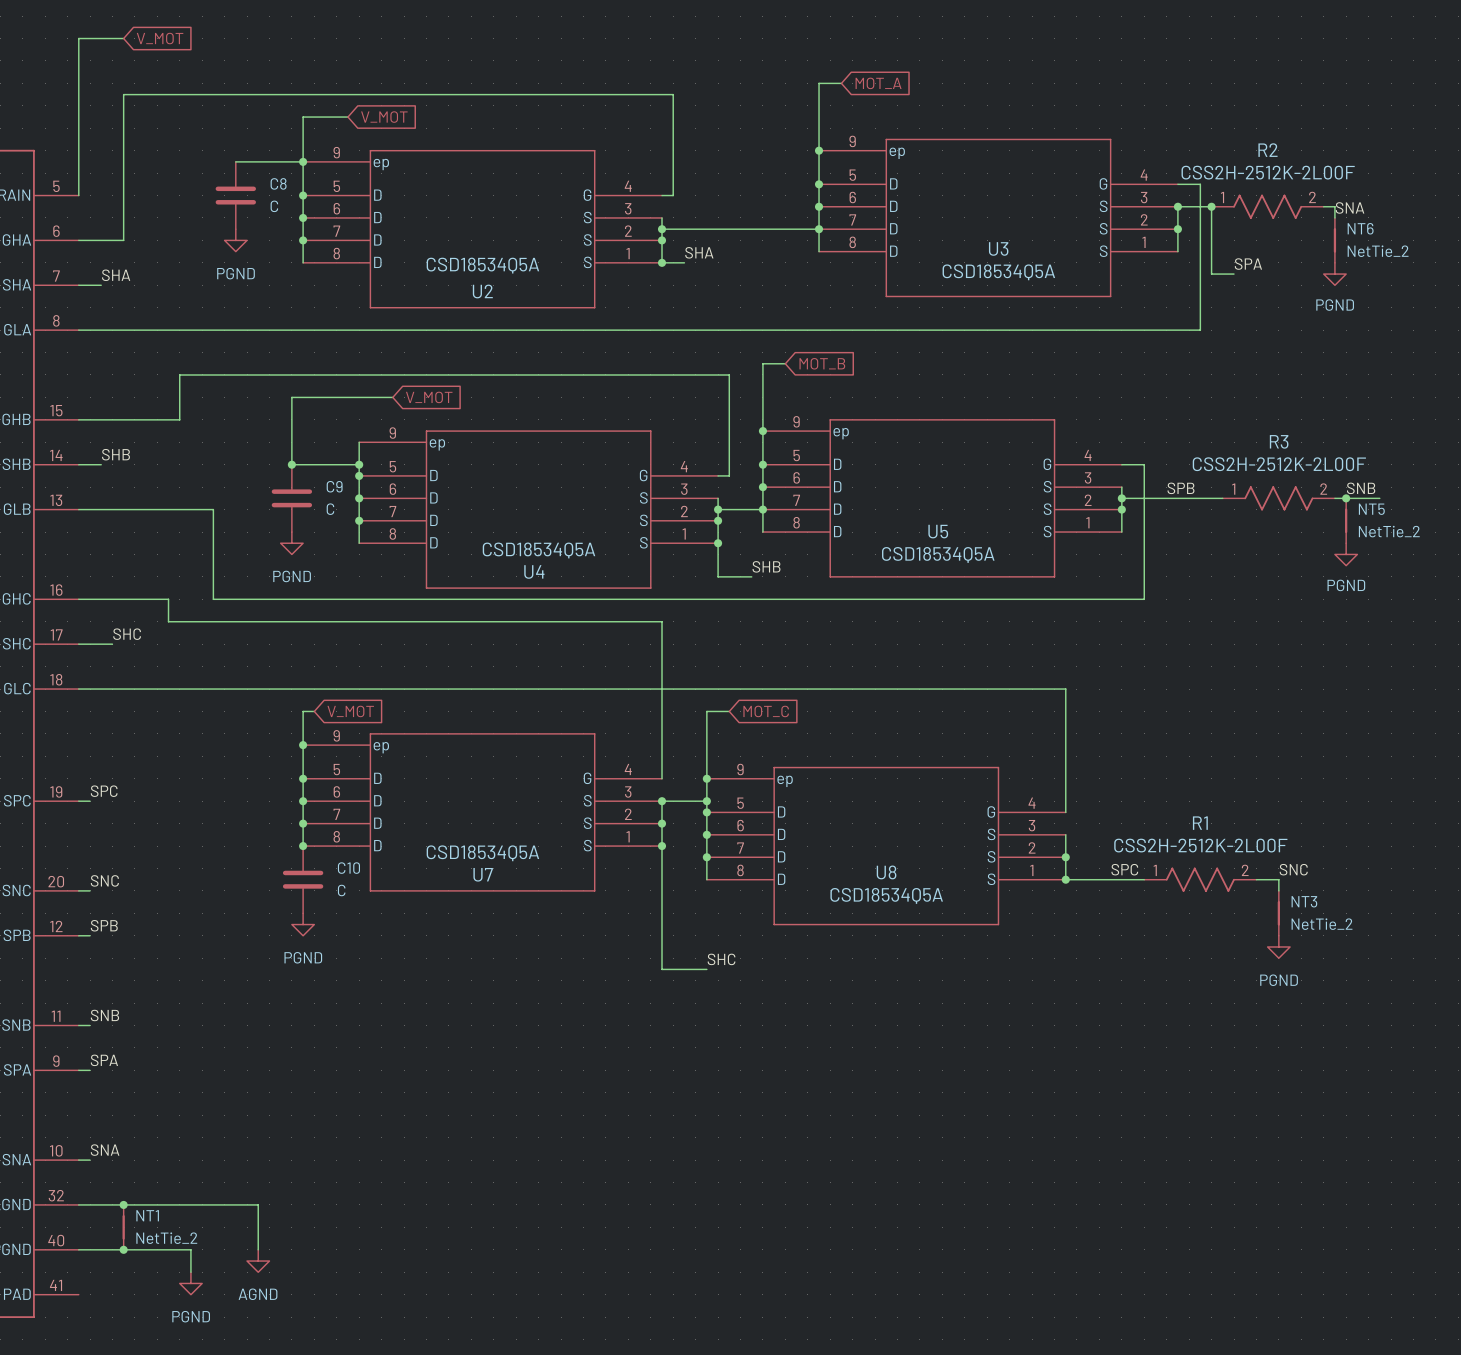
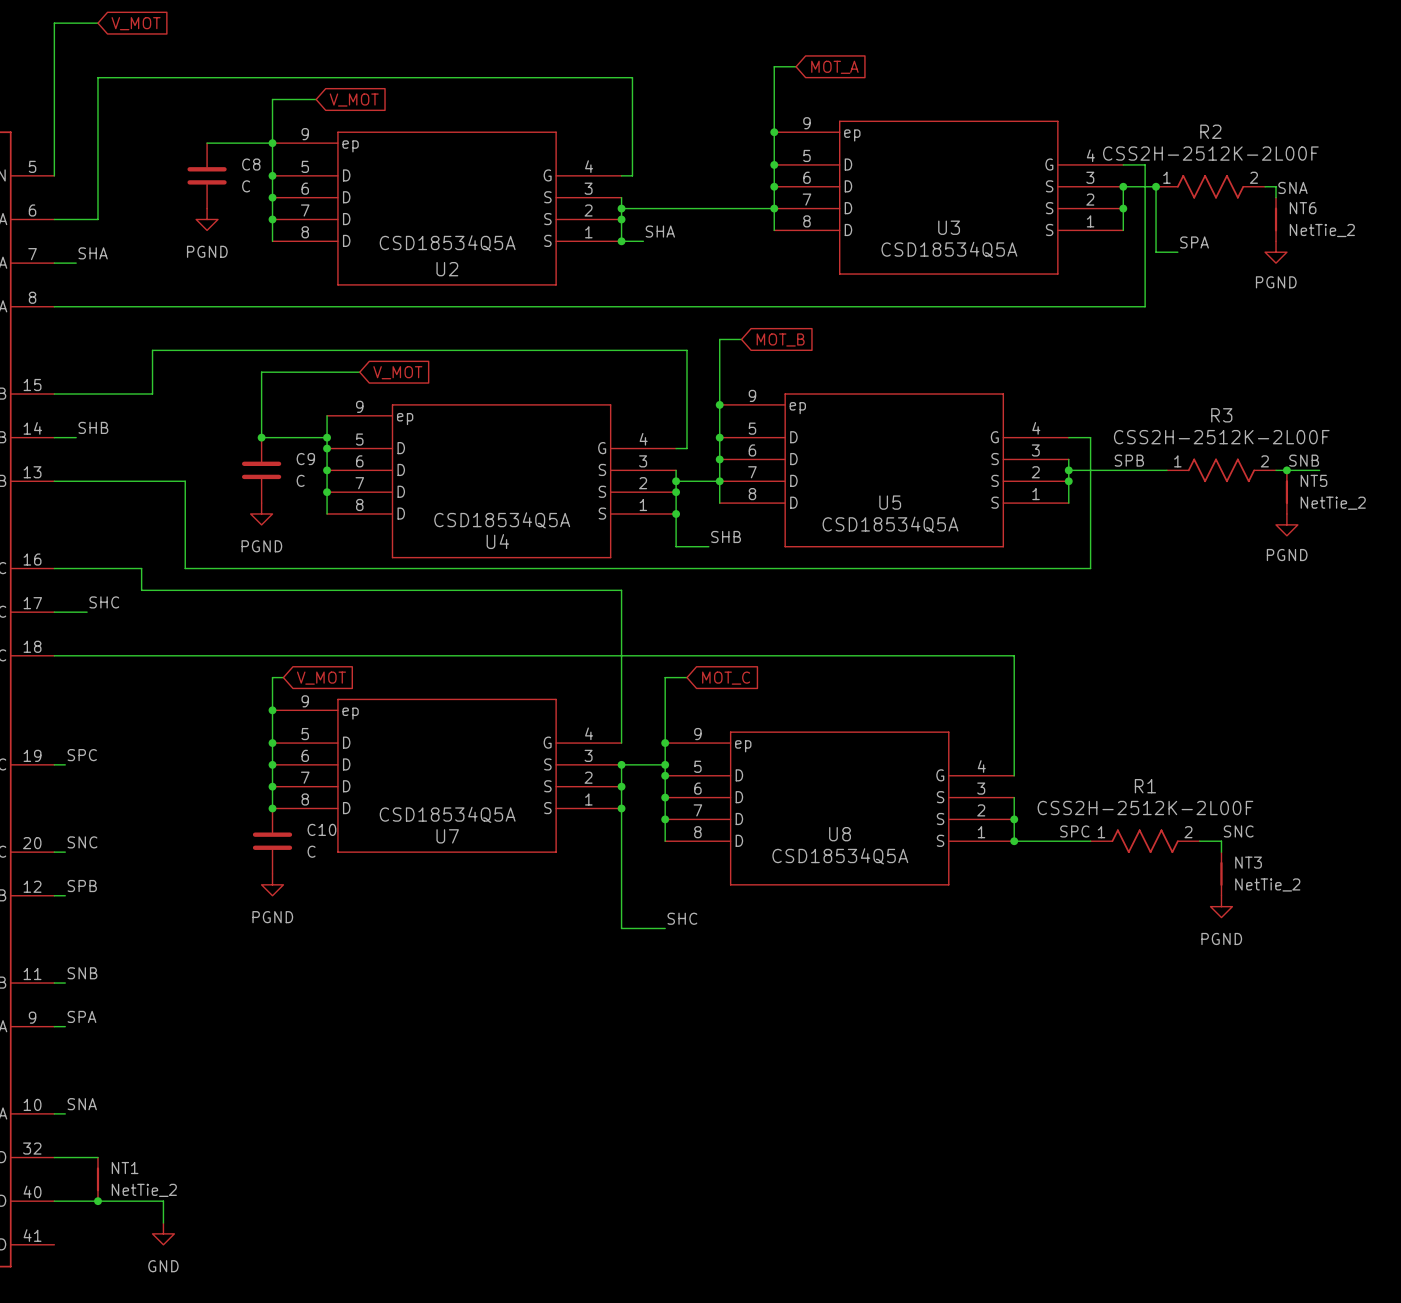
wire: (123, 1204) (258, 1204) (258, 1249) -> none
junction: (123, 1204) -> none
power symbol: AGND (258, 1261) -> none
power symbol: PGND (190, 1283) -> GND (163, 1233)

